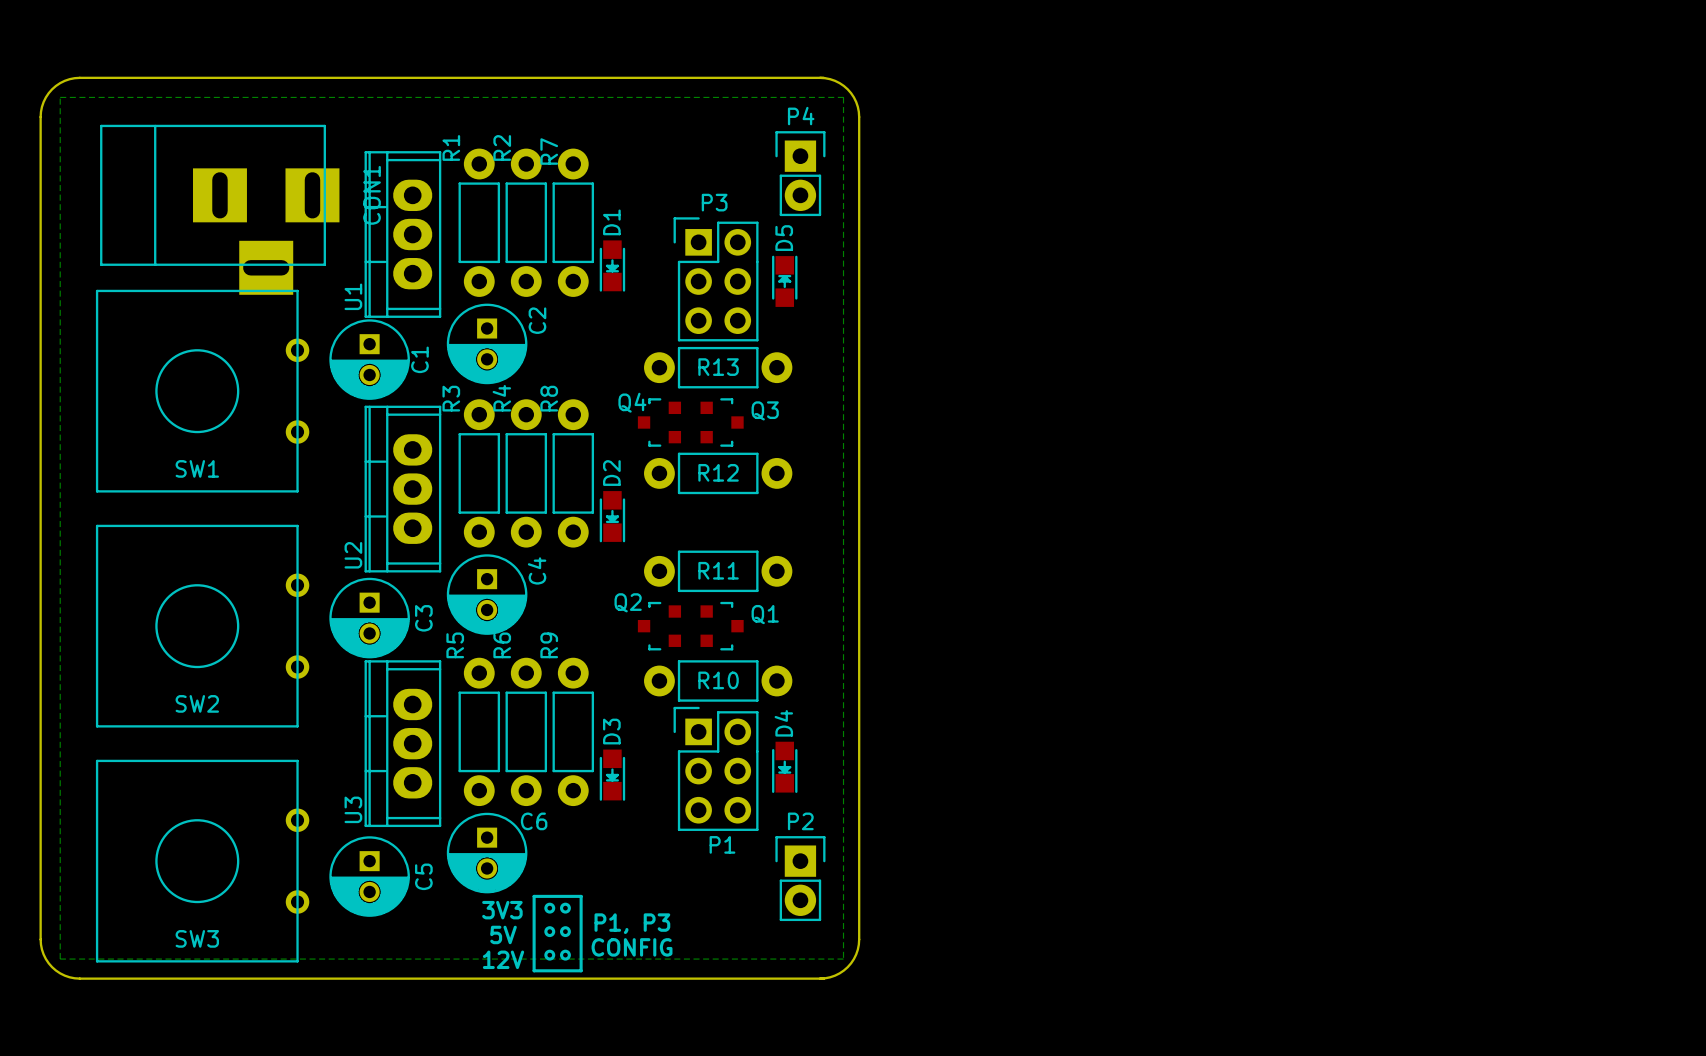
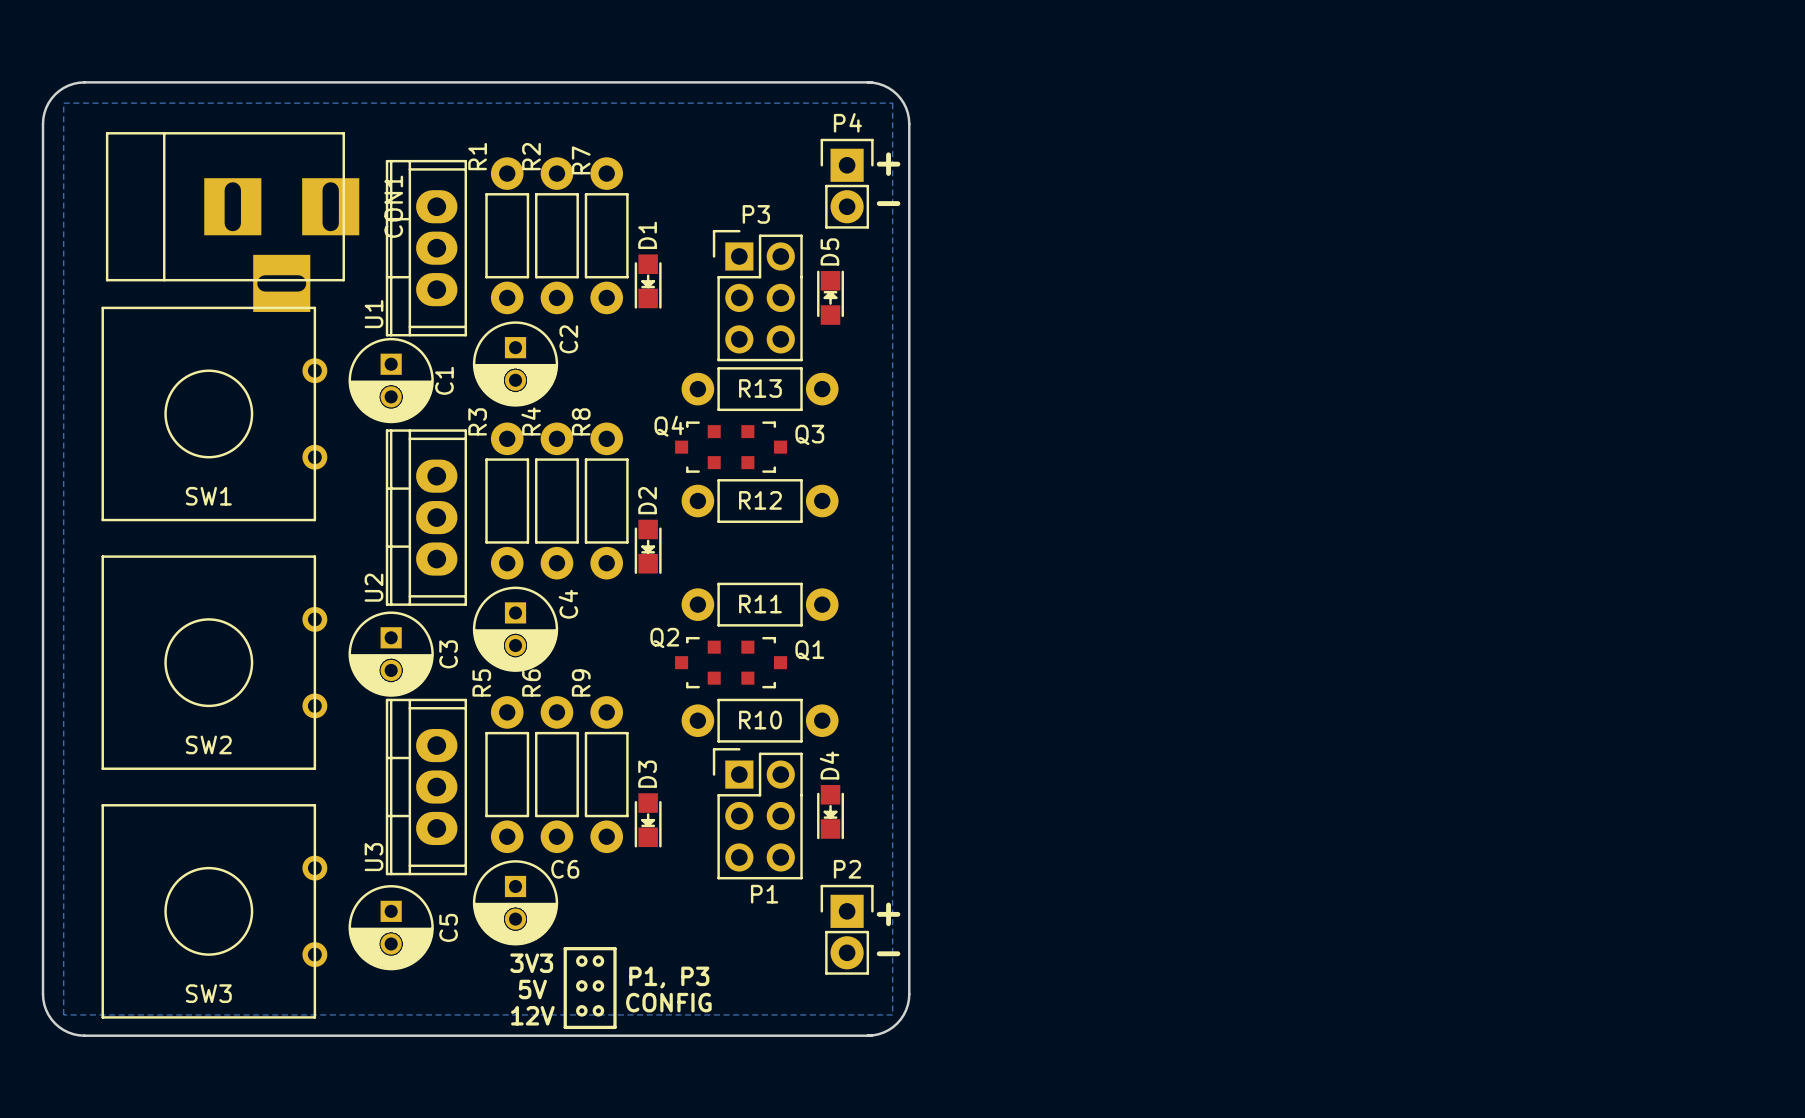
text: none -> + (888, 164)
text: none -> - (888, 203)
text: none -> + (888, 914)
text: none -> - (888, 953)

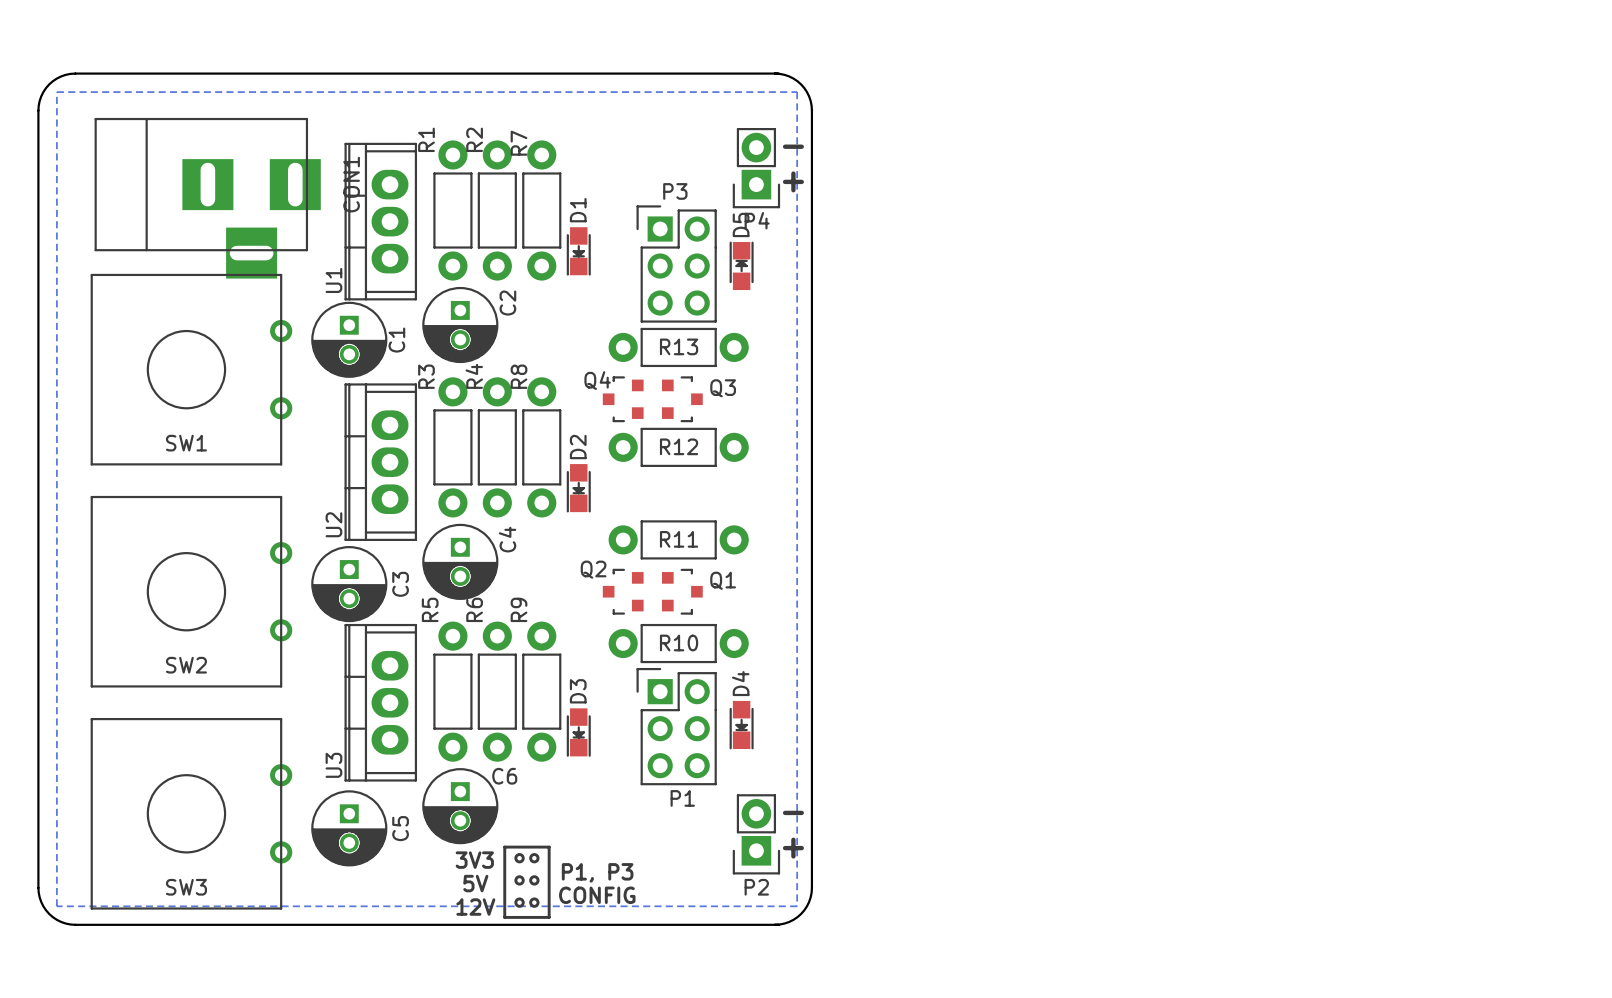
text: + (888, 164) -> - (793, 146)
P4 rotation: 0° (847, 183) -> 180° (756, 168)
text: - (888, 203) -> + (793, 181)
text: + (888, 914) -> - (793, 812)
P2 rotation: 0° (847, 929) -> 180° (756, 834)
text: - (888, 953) -> + (793, 848)

